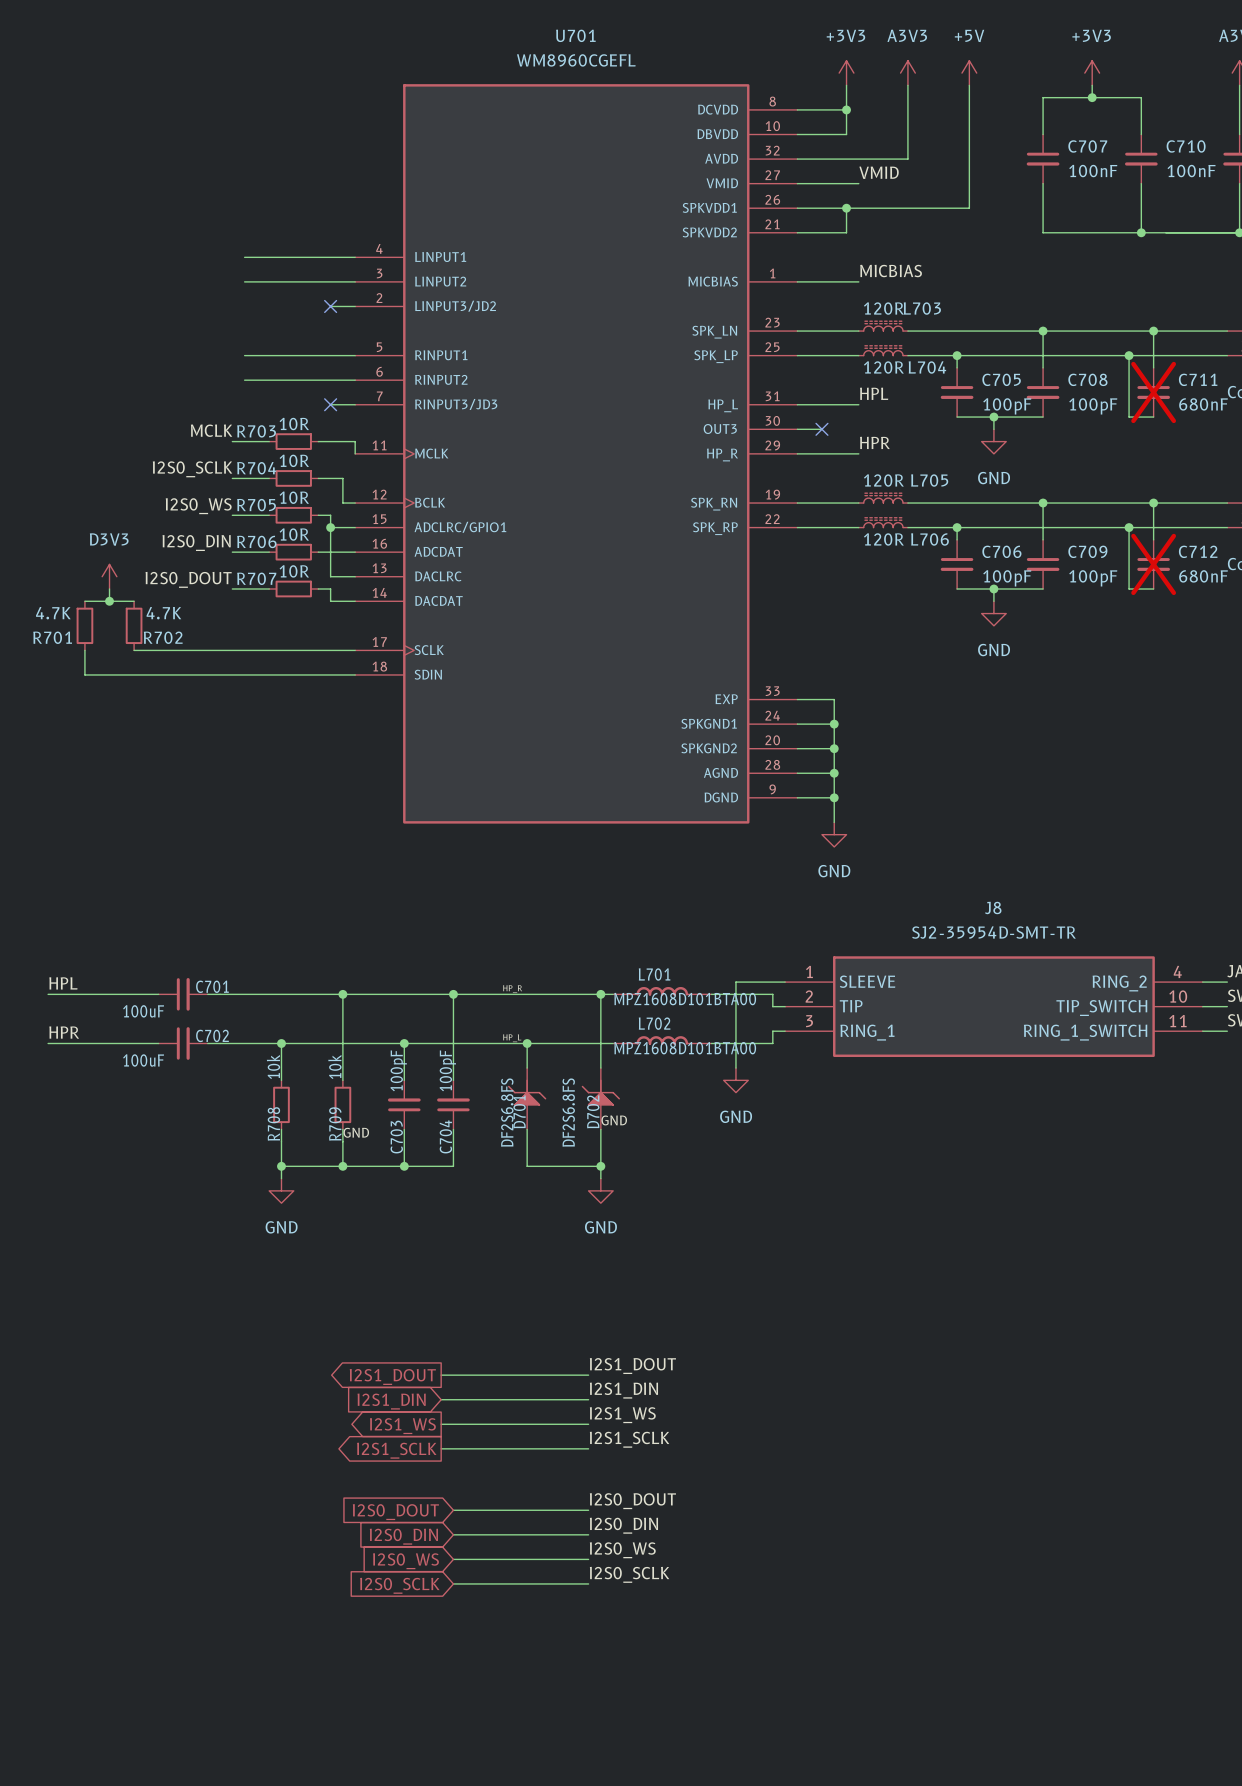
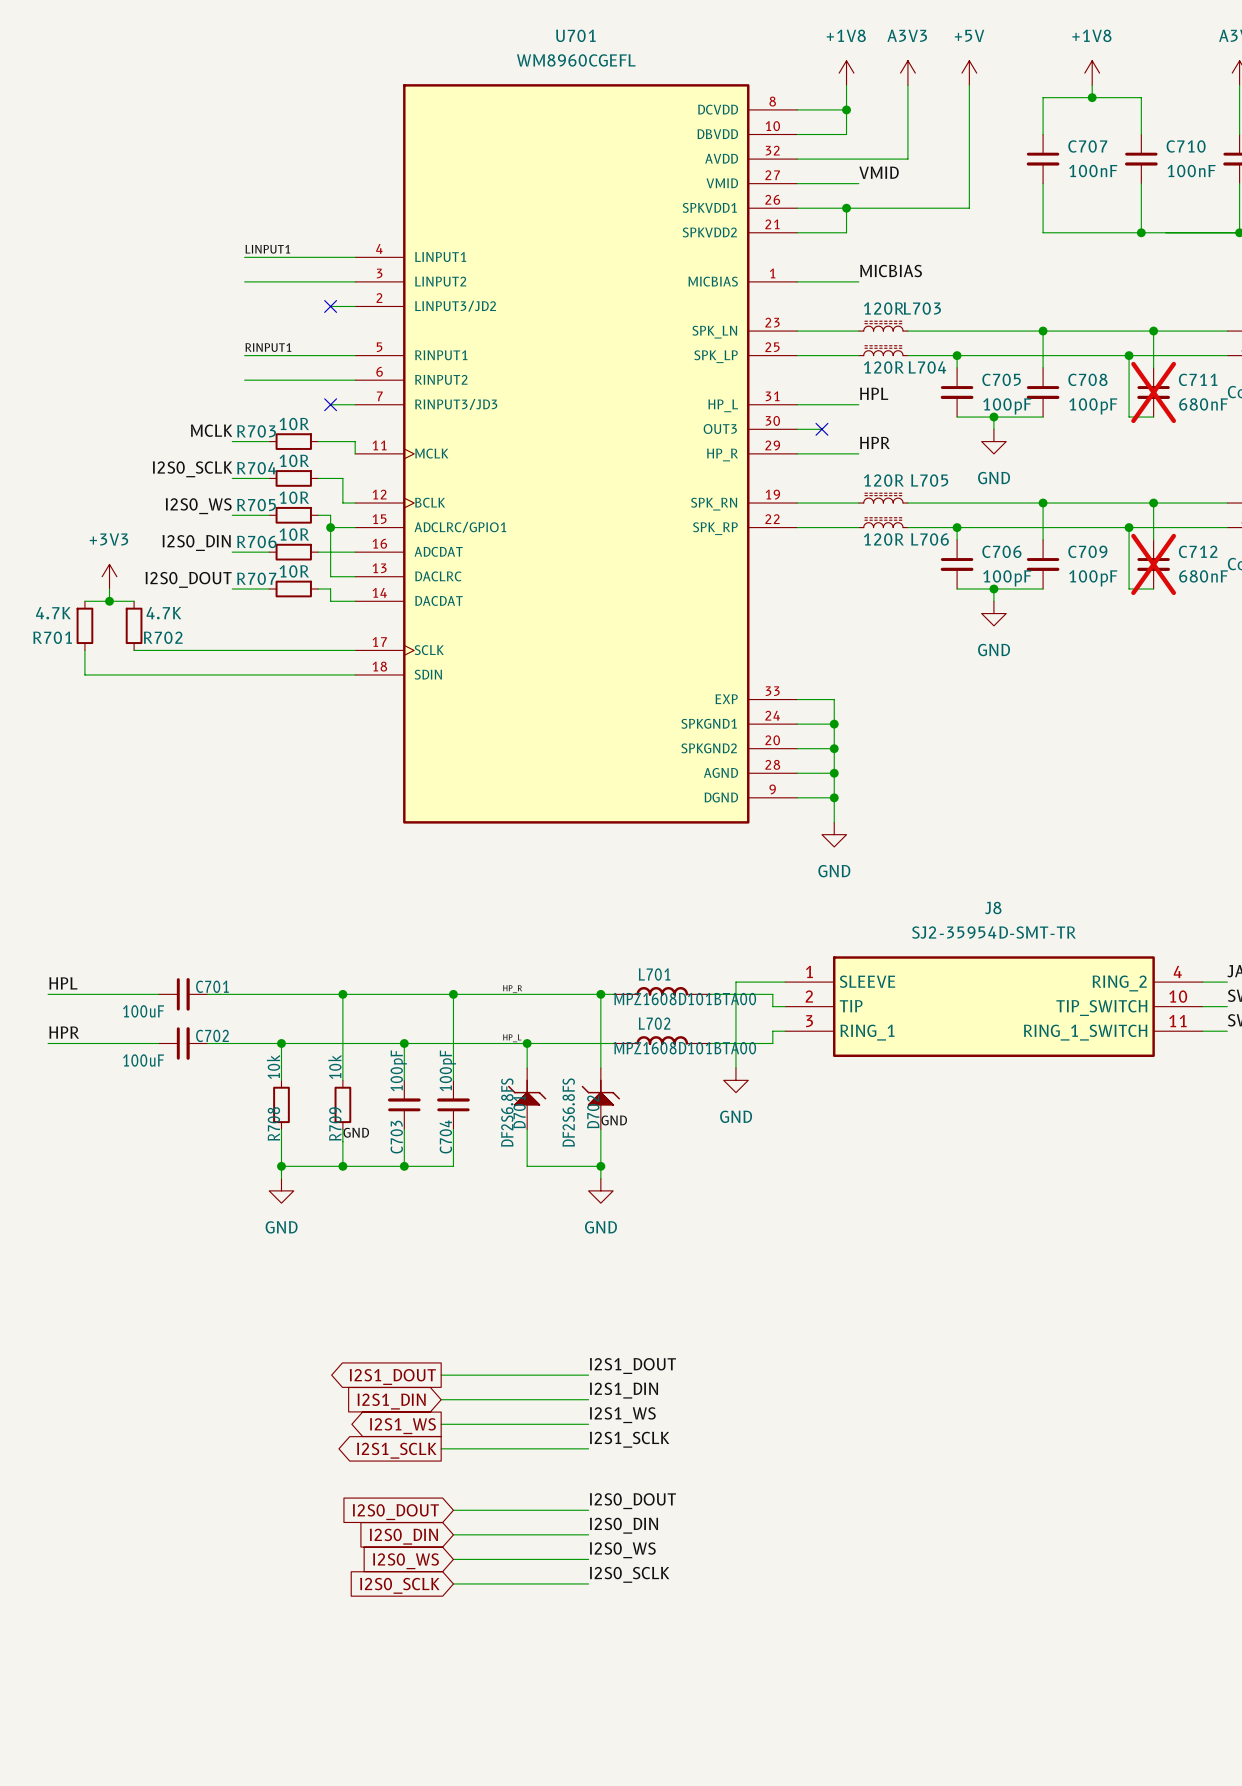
power symbol: +3V3 (846, 73) -> +1V8 (846, 73)
power symbol: +3V3 (1092, 73) -> +1V8 (1092, 73)
label: none -> LINPUT1 (267, 249)
label: none -> RINPUT1 (268, 347)
power symbol: D3V3 (109, 576) -> +3V3 (109, 576)

